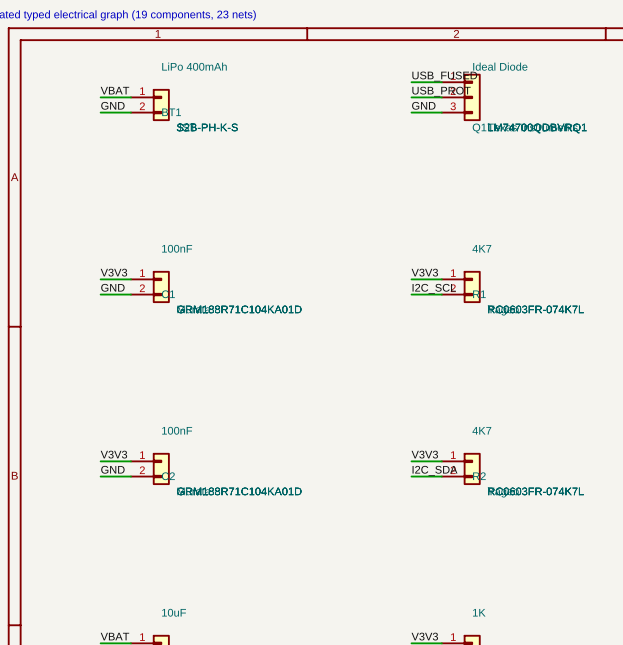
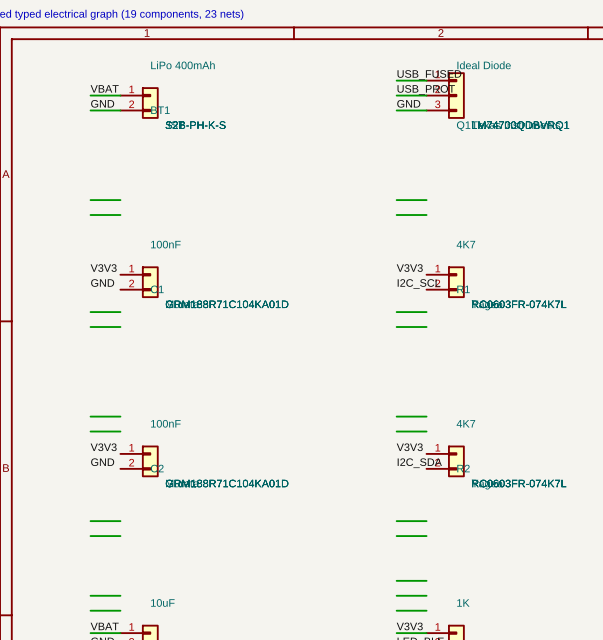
wire: none -> (90, 200) (120, 200)
wire: none -> (396, 200) (426, 200)
wire: none -> (90, 215) (120, 215)
wire: none -> (396, 215) (426, 215)
wire: (100, 279) (130, 279) -> (90, 416) (120, 416)
wire: (411, 279) (441, 279) -> (396, 416) (426, 416)
wire: (100, 294) (130, 294) -> (90, 431) (120, 431)
wire: (411, 294) (441, 294) -> (396, 431) (426, 431)
wire: none -> (90, 312) (120, 312)
wire: none -> (396, 312) (426, 312)
wire: none -> (90, 327) (120, 327)
wire: none -> (396, 327) (426, 327)
wire: (100, 461) (130, 461) -> (90, 595) (120, 595)
wire: (411, 461) (441, 461) -> (396, 595) (426, 595)
wire: (100, 476) (130, 476) -> (90, 610) (120, 610)
wire: (411, 476) (441, 476) -> (396, 610) (426, 610)
wire: none -> (90, 521) (120, 521)
wire: none -> (396, 521) (426, 521)
wire: none -> (90, 536) (120, 536)
wire: none -> (396, 536) (426, 536)
wire: none -> (396, 580) (426, 580)

